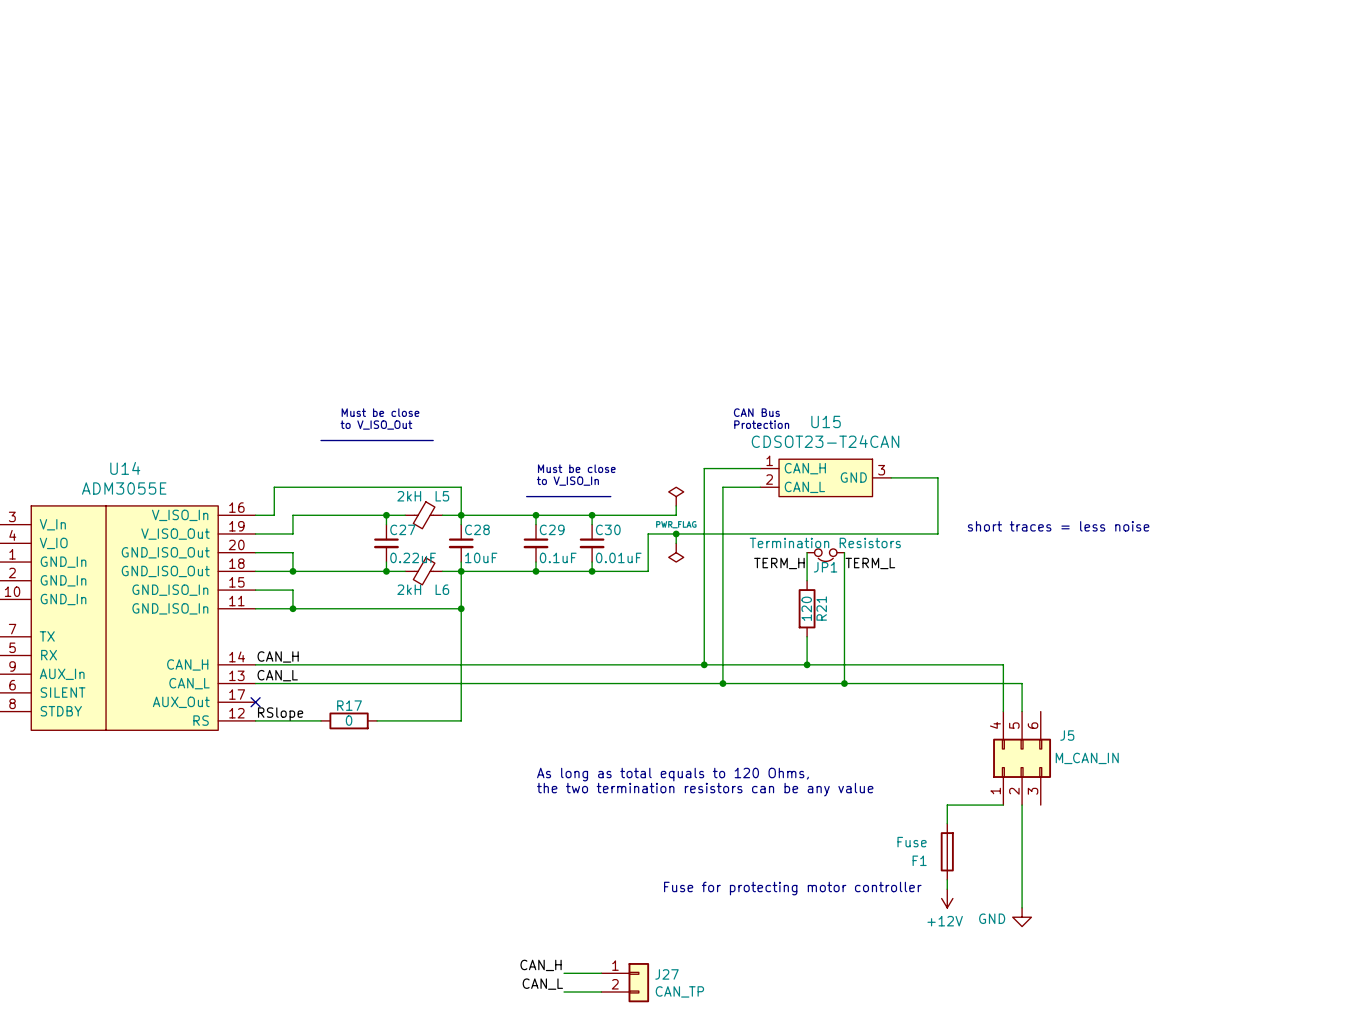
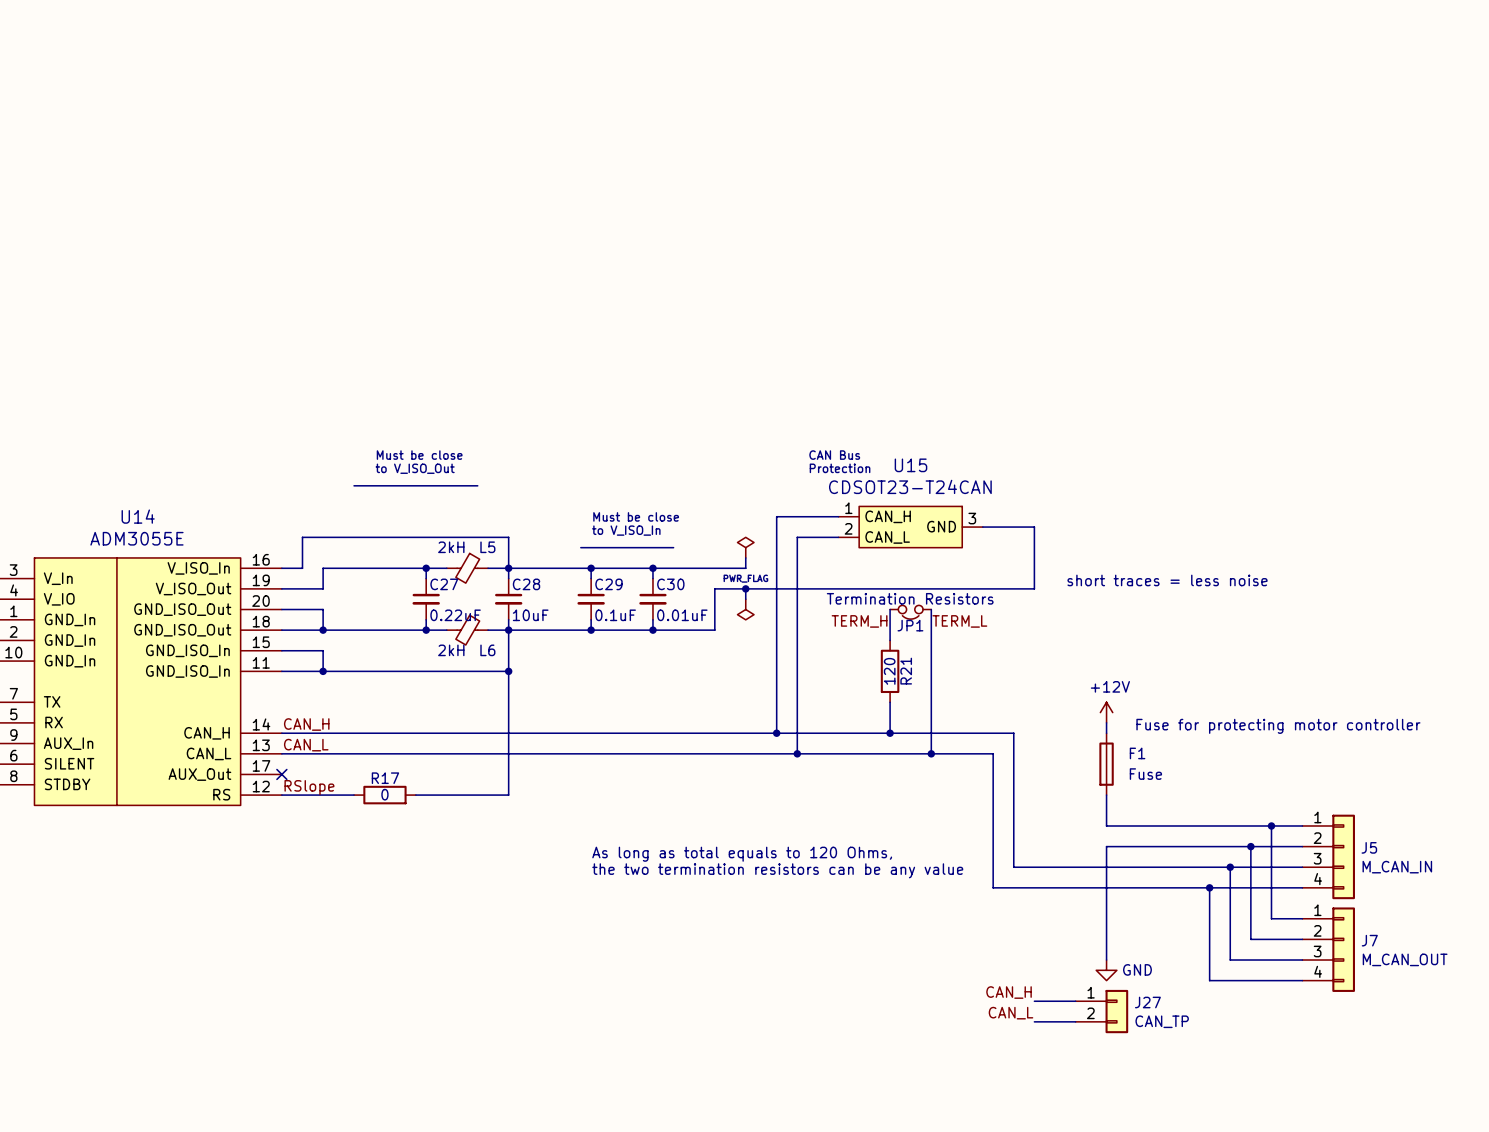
power symbol: none -> +12V (1106, 712)
wire: none -> (1106, 722) (1106, 733)
text: none -> Fuse for protecting motor controller (1278, 726)
wire: (919, 664) (1003, 664) (1003, 711) -> (1013, 733) (1013, 867) (1302, 867)
wire: (900, 683) (1022, 683) (1022, 711) -> (993, 753) (993, 887) (1044, 887)
J5 symbol: [993, 711, 1052, 806] -> [1302, 814, 1355, 900]
wire: none -> (1106, 795) (1106, 825) (1302, 825)
J5 name position: J5 (1067, 735) -> J5 (1369, 847)
wire: none -> (1271, 825) (1271, 918) (1302, 918)
junction: none -> (1271, 825)
wire: none -> (1250, 846) (1250, 939) (1302, 939)
junction: none -> (1250, 846)
wire: none -> (1302, 846) (1106, 846) (1106, 960)
wire: none -> (1230, 867) (1230, 960) (1302, 960)
junction: none -> (1230, 867)
wire: (947, 805) (947, 823) -> none
wire: none -> (1106, 887) (1302, 887)
wire: (1022, 805) (1022, 907) -> none
wire: none -> (1209, 887) (1209, 980) (1302, 980)
junction: none -> (1209, 887)
F1 value position: Fuse (912, 842) -> Fuse (1145, 774)
F1 position: (947, 851) -> (1106, 764)
F1 name position: F1 (919, 860) -> F1 (1137, 753)
J7: none -> M_CAN_OUT (1328, 949)
wire: (947, 879) (947, 889) -> none
text: Fuse for protecting motor controller (792, 888) -> none
power symbol: +12V (947, 898) -> none
label: none -> CAN_H (1009, 992)
wire: none -> (1034, 1001) (1075, 1001)
power symbol position: GND (1022, 917) -> GND (1106, 970)
label: none -> CAN_L (1011, 1013)
power symbol text position: GND (992, 918) -> GND (1137, 969)
wire: none -> (1034, 1021) (1075, 1021)
label: CAN_H (541, 965) -> none
wire: (564, 973) (601, 973) -> none
J27 position: (625, 982) -> (1101, 1011)
label: CAN_L (542, 984) -> none
wire: (564, 992) (601, 992) -> none

